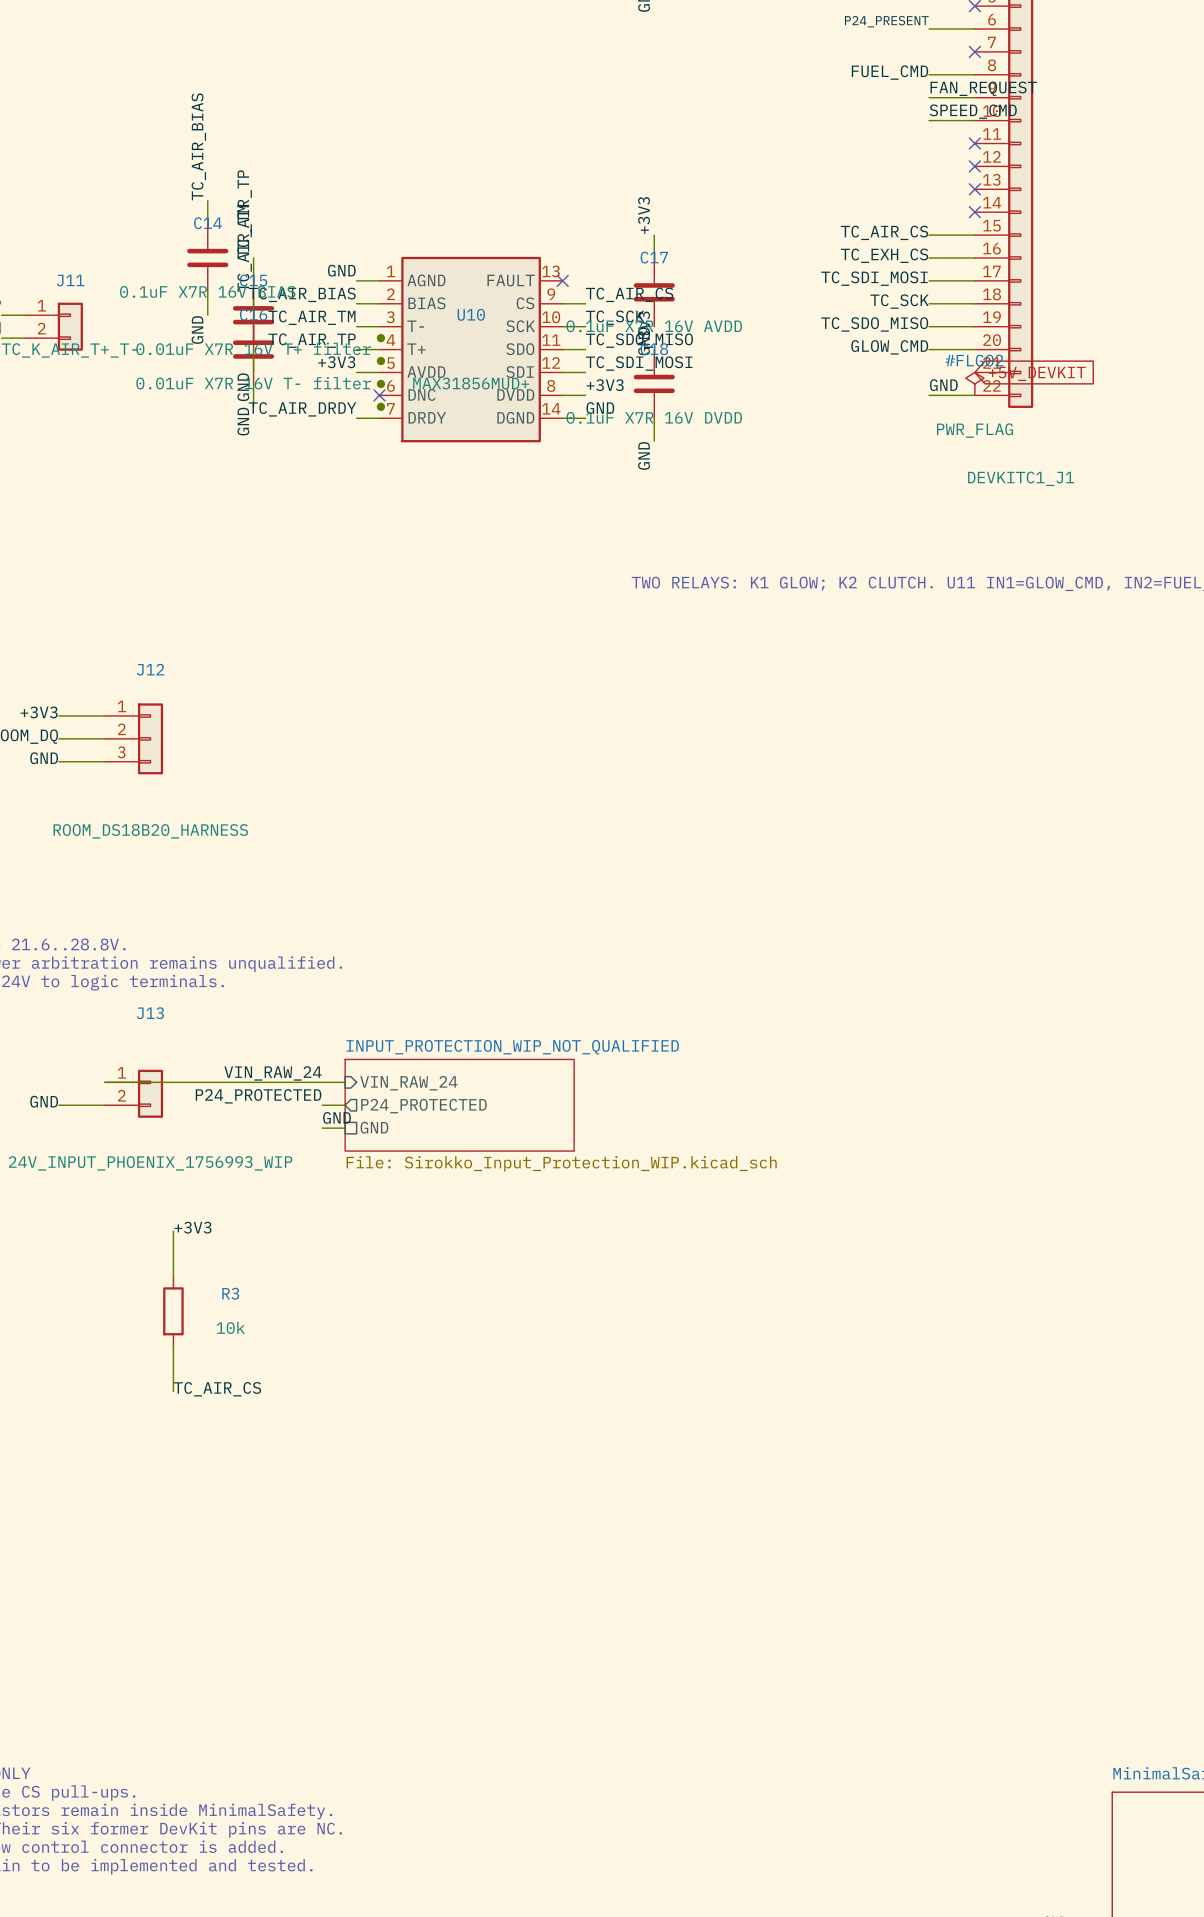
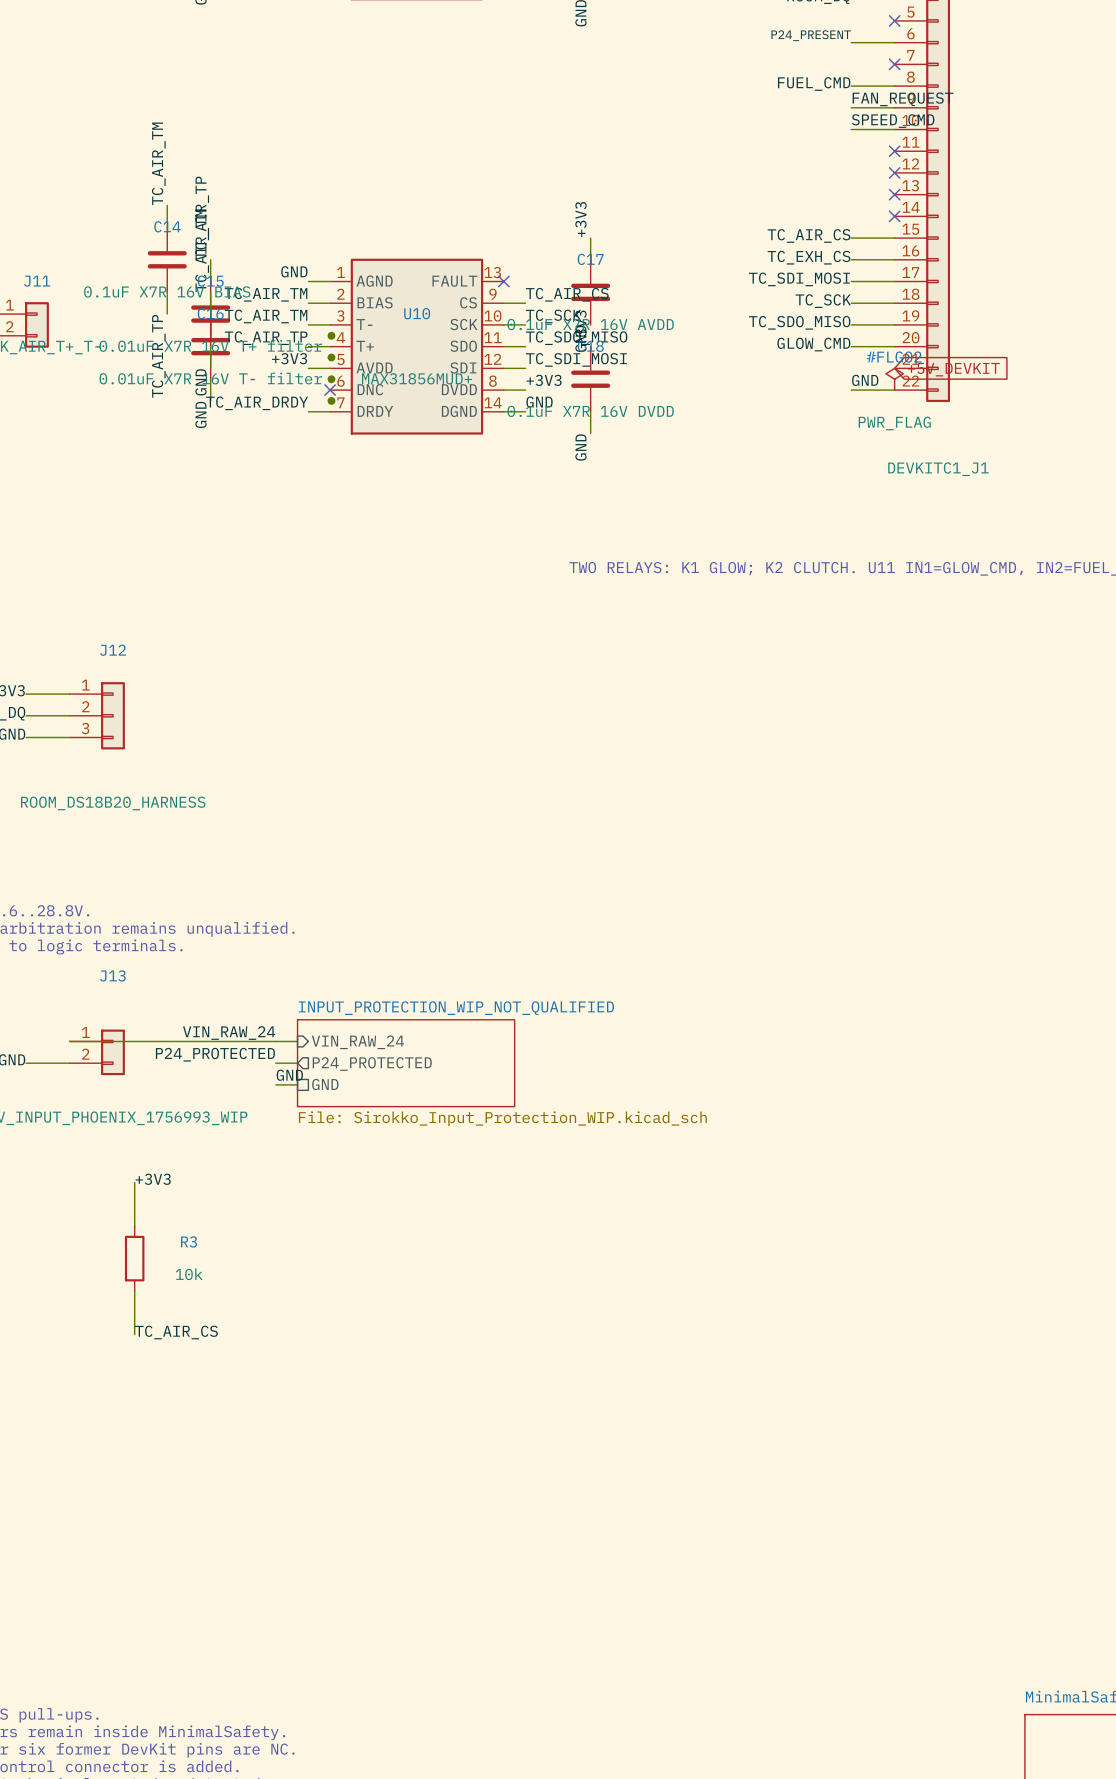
label: TC_AIR_BIAS (198, 146) -> TC_AIR_TM (158, 163)
label: TC_AIR_BIAS (302, 294) -> TC_AIR_TM (266, 294)
label: GND (197, 330) -> TC_AIR_TP (158, 356)

